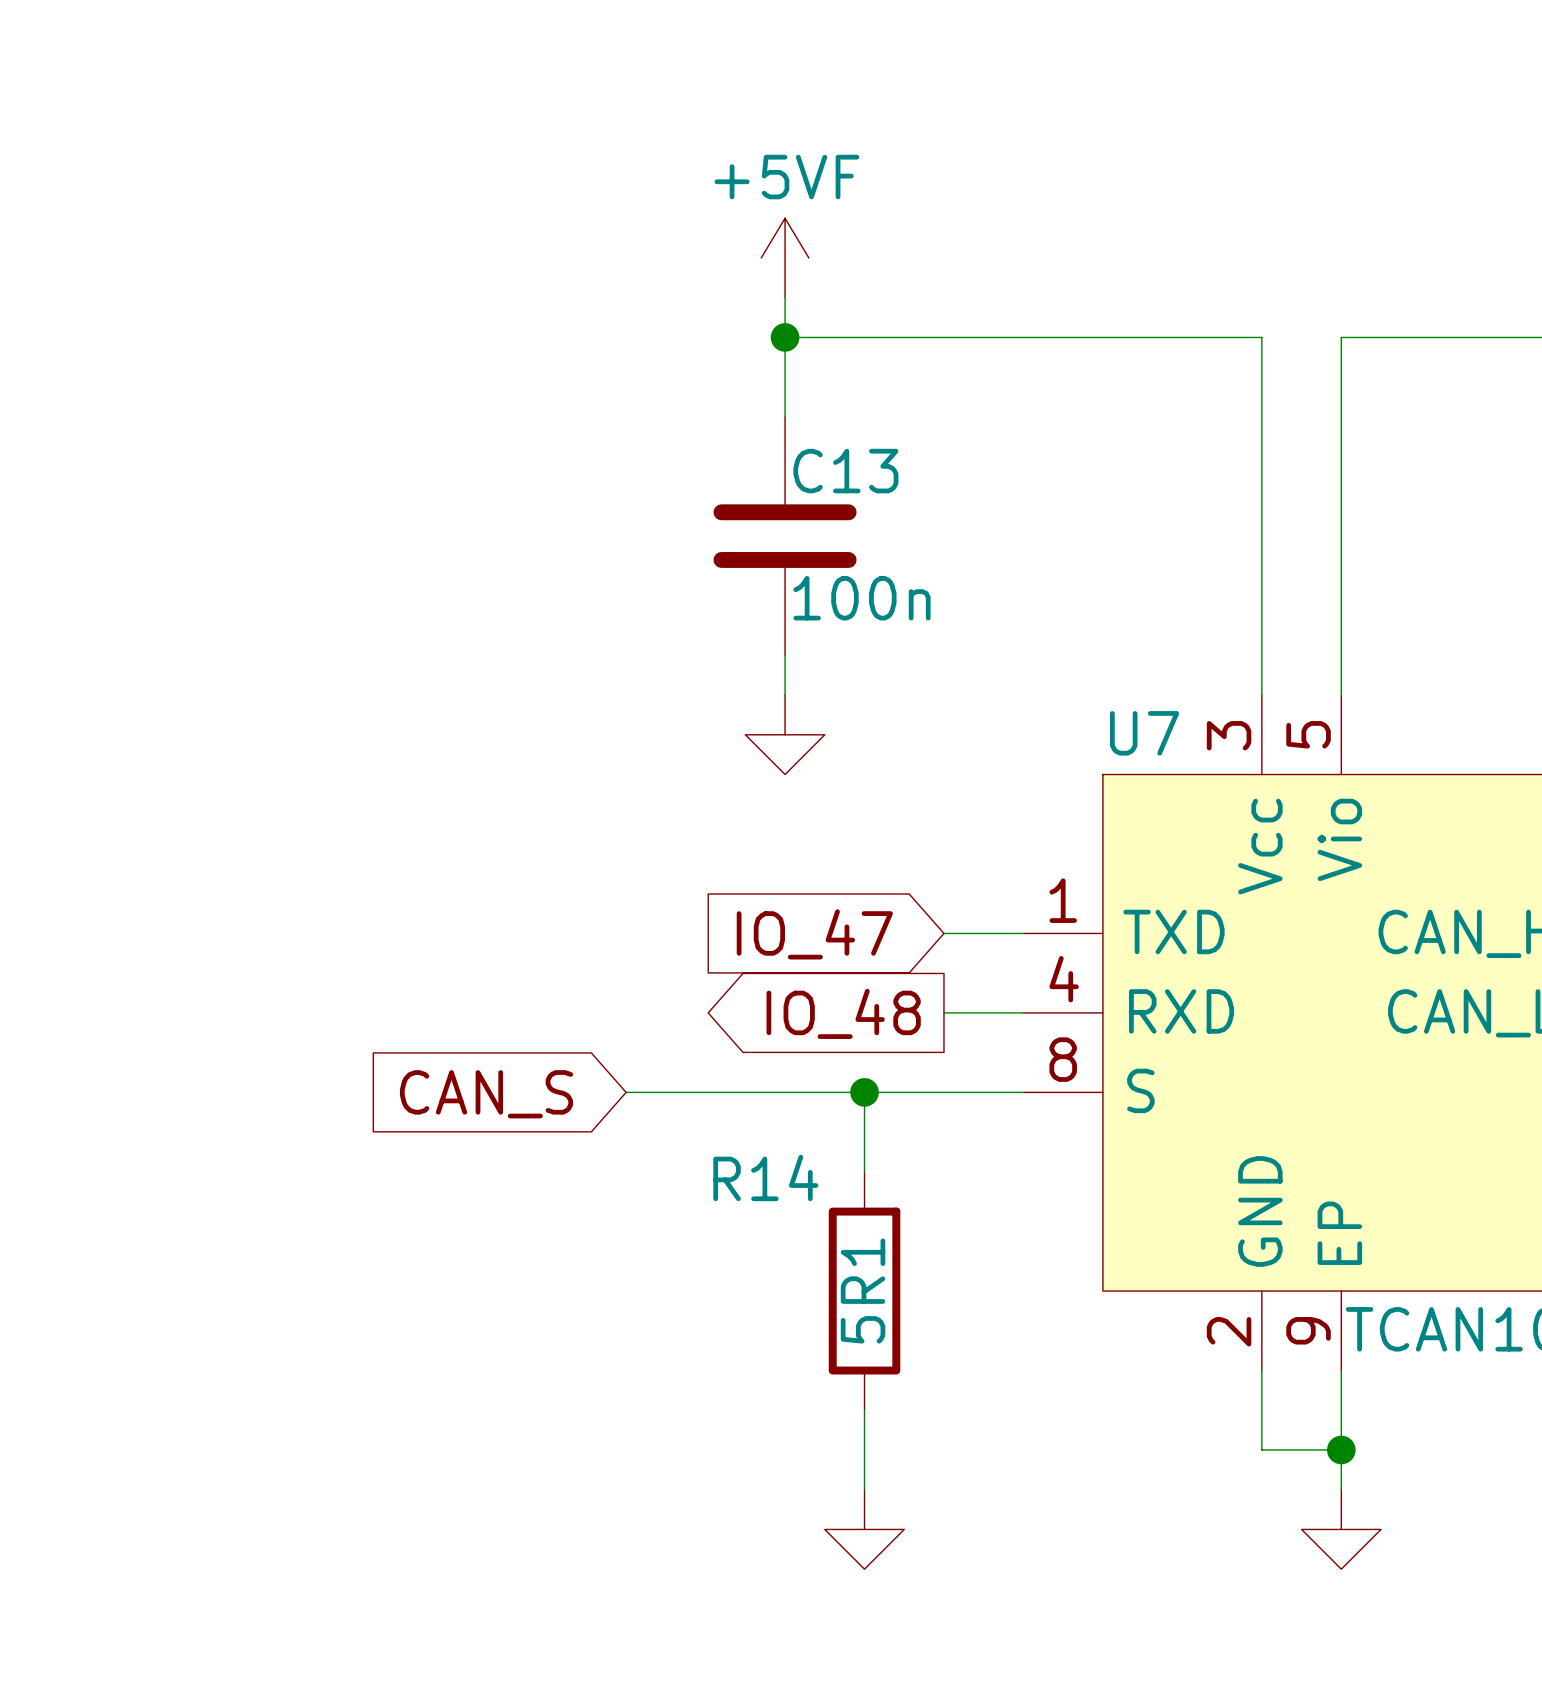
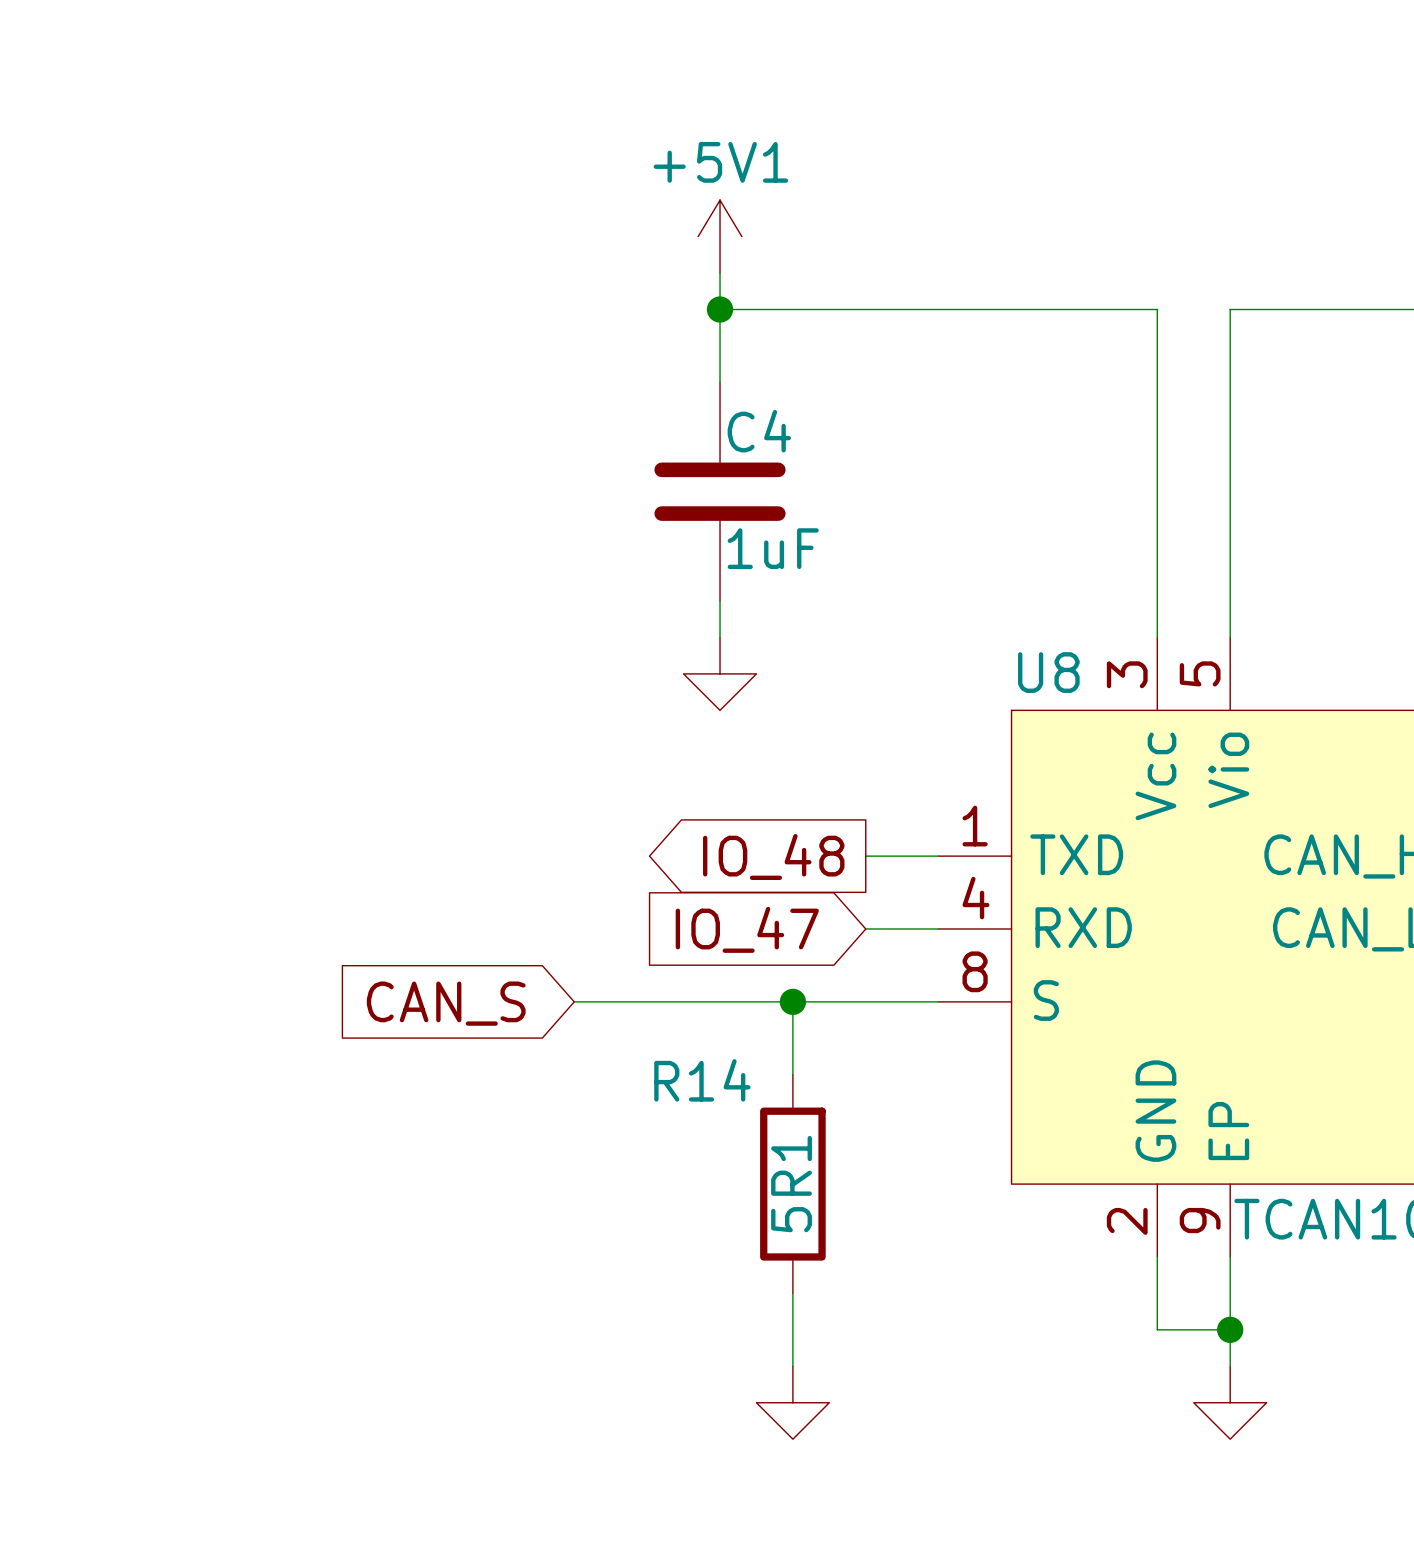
power symbol: +5VF (785, 257) -> +5V1 (720, 236)
C13 name: C13 (845, 471) -> C4 (759, 431)
C13 value: 100n (861, 598) -> 1uF (773, 548)
U7 name: U7 (1144, 733) -> U8 (1048, 672)
global label shape: input (814, 934) -> output (773, 856)
global label: IO_47 (814, 934) -> IO_48 (773, 856)
global label shape: output (843, 1013) -> input (747, 929)
global label: IO_48 (843, 1013) -> IO_47 (747, 929)

